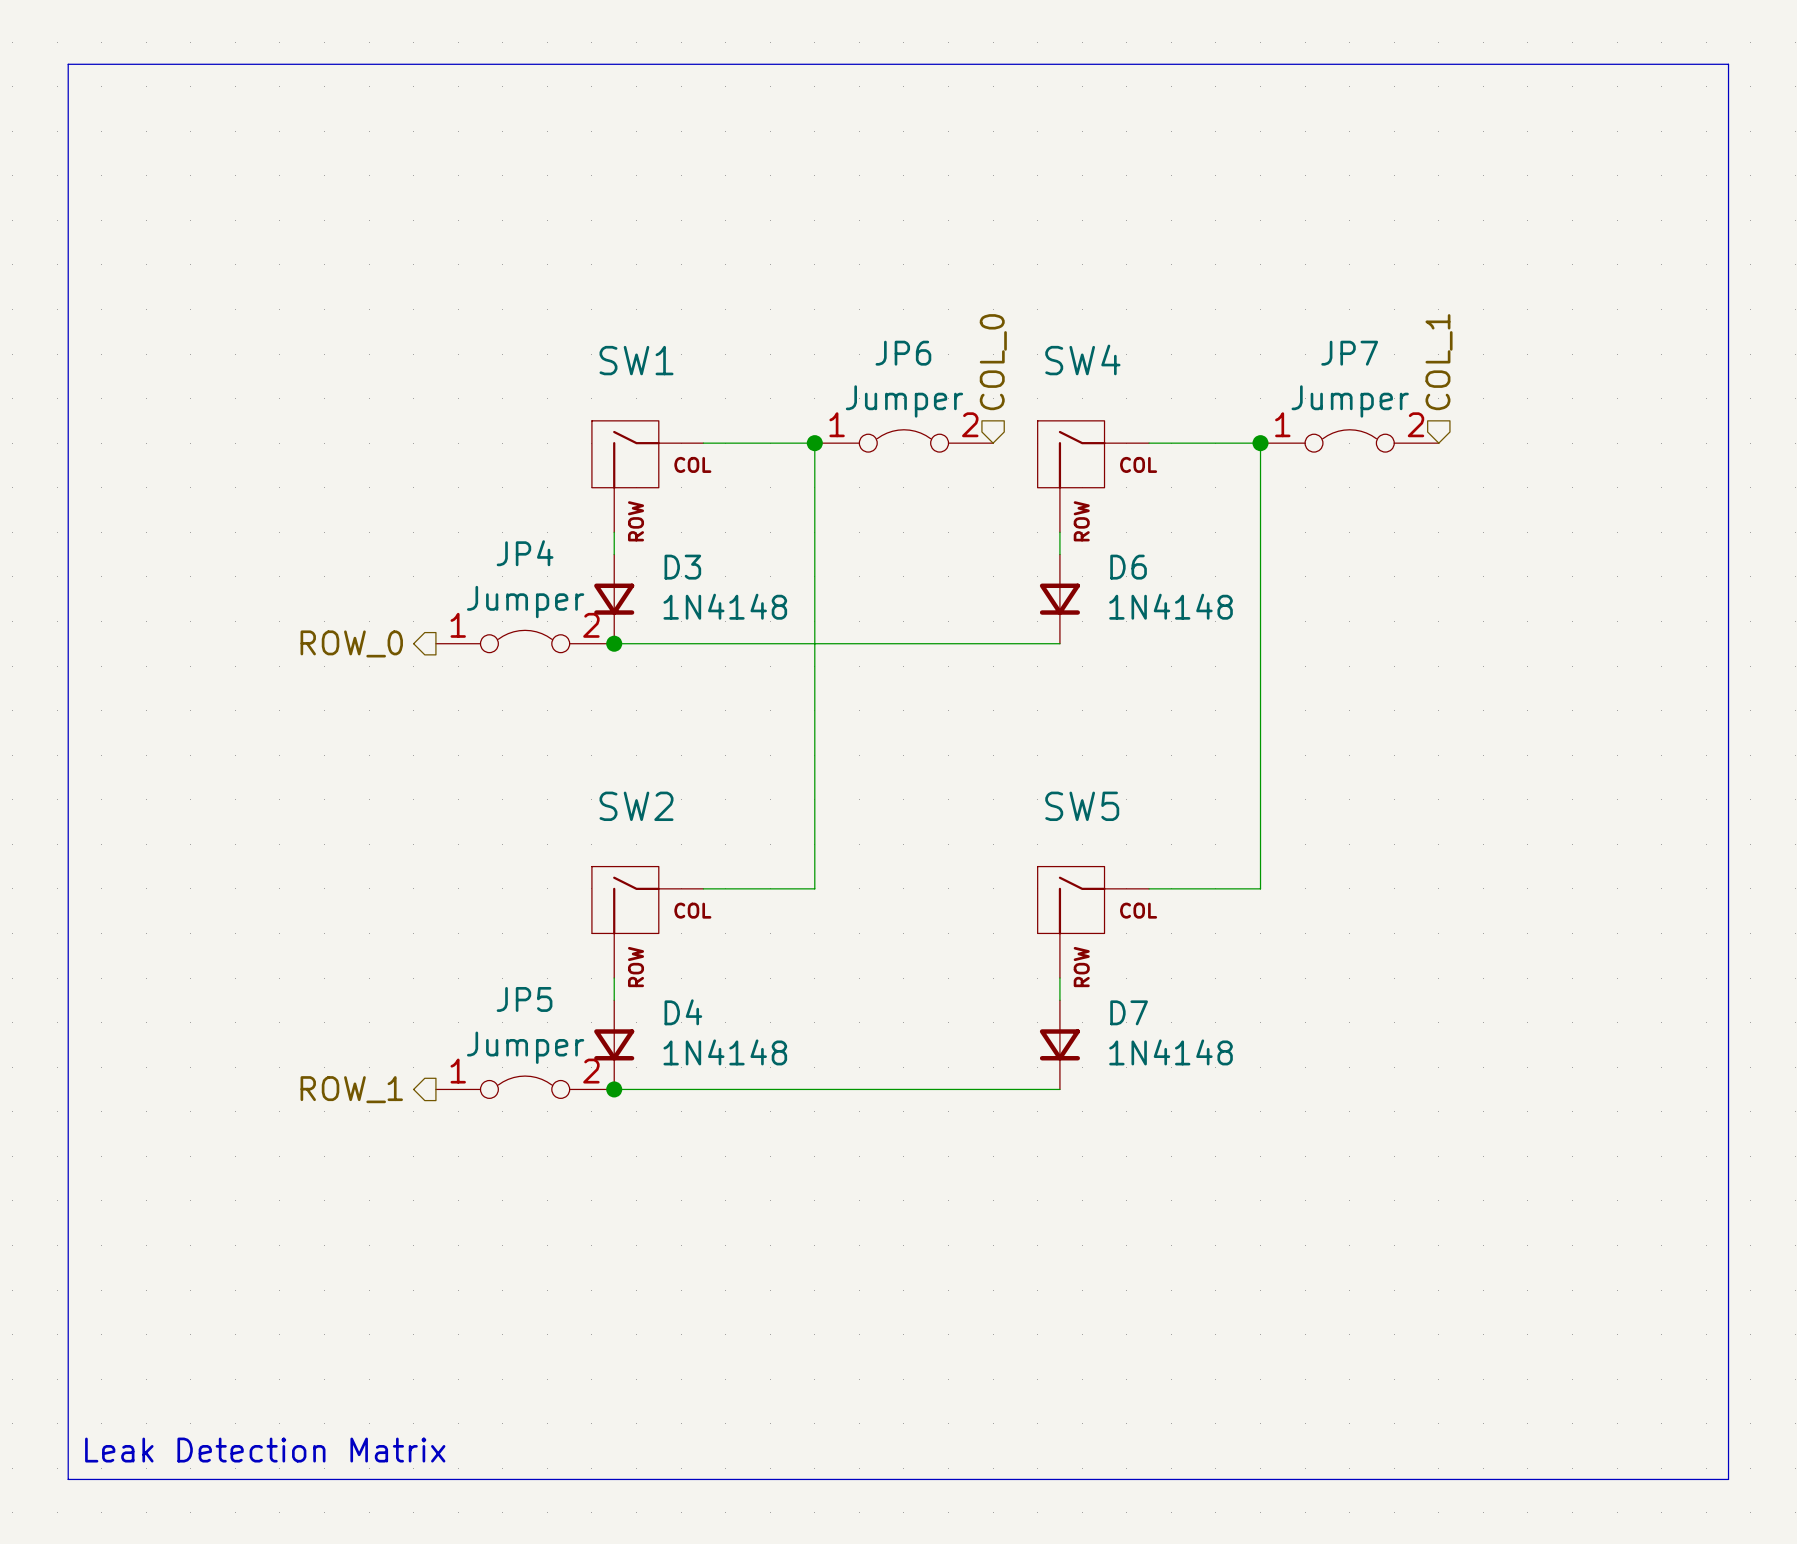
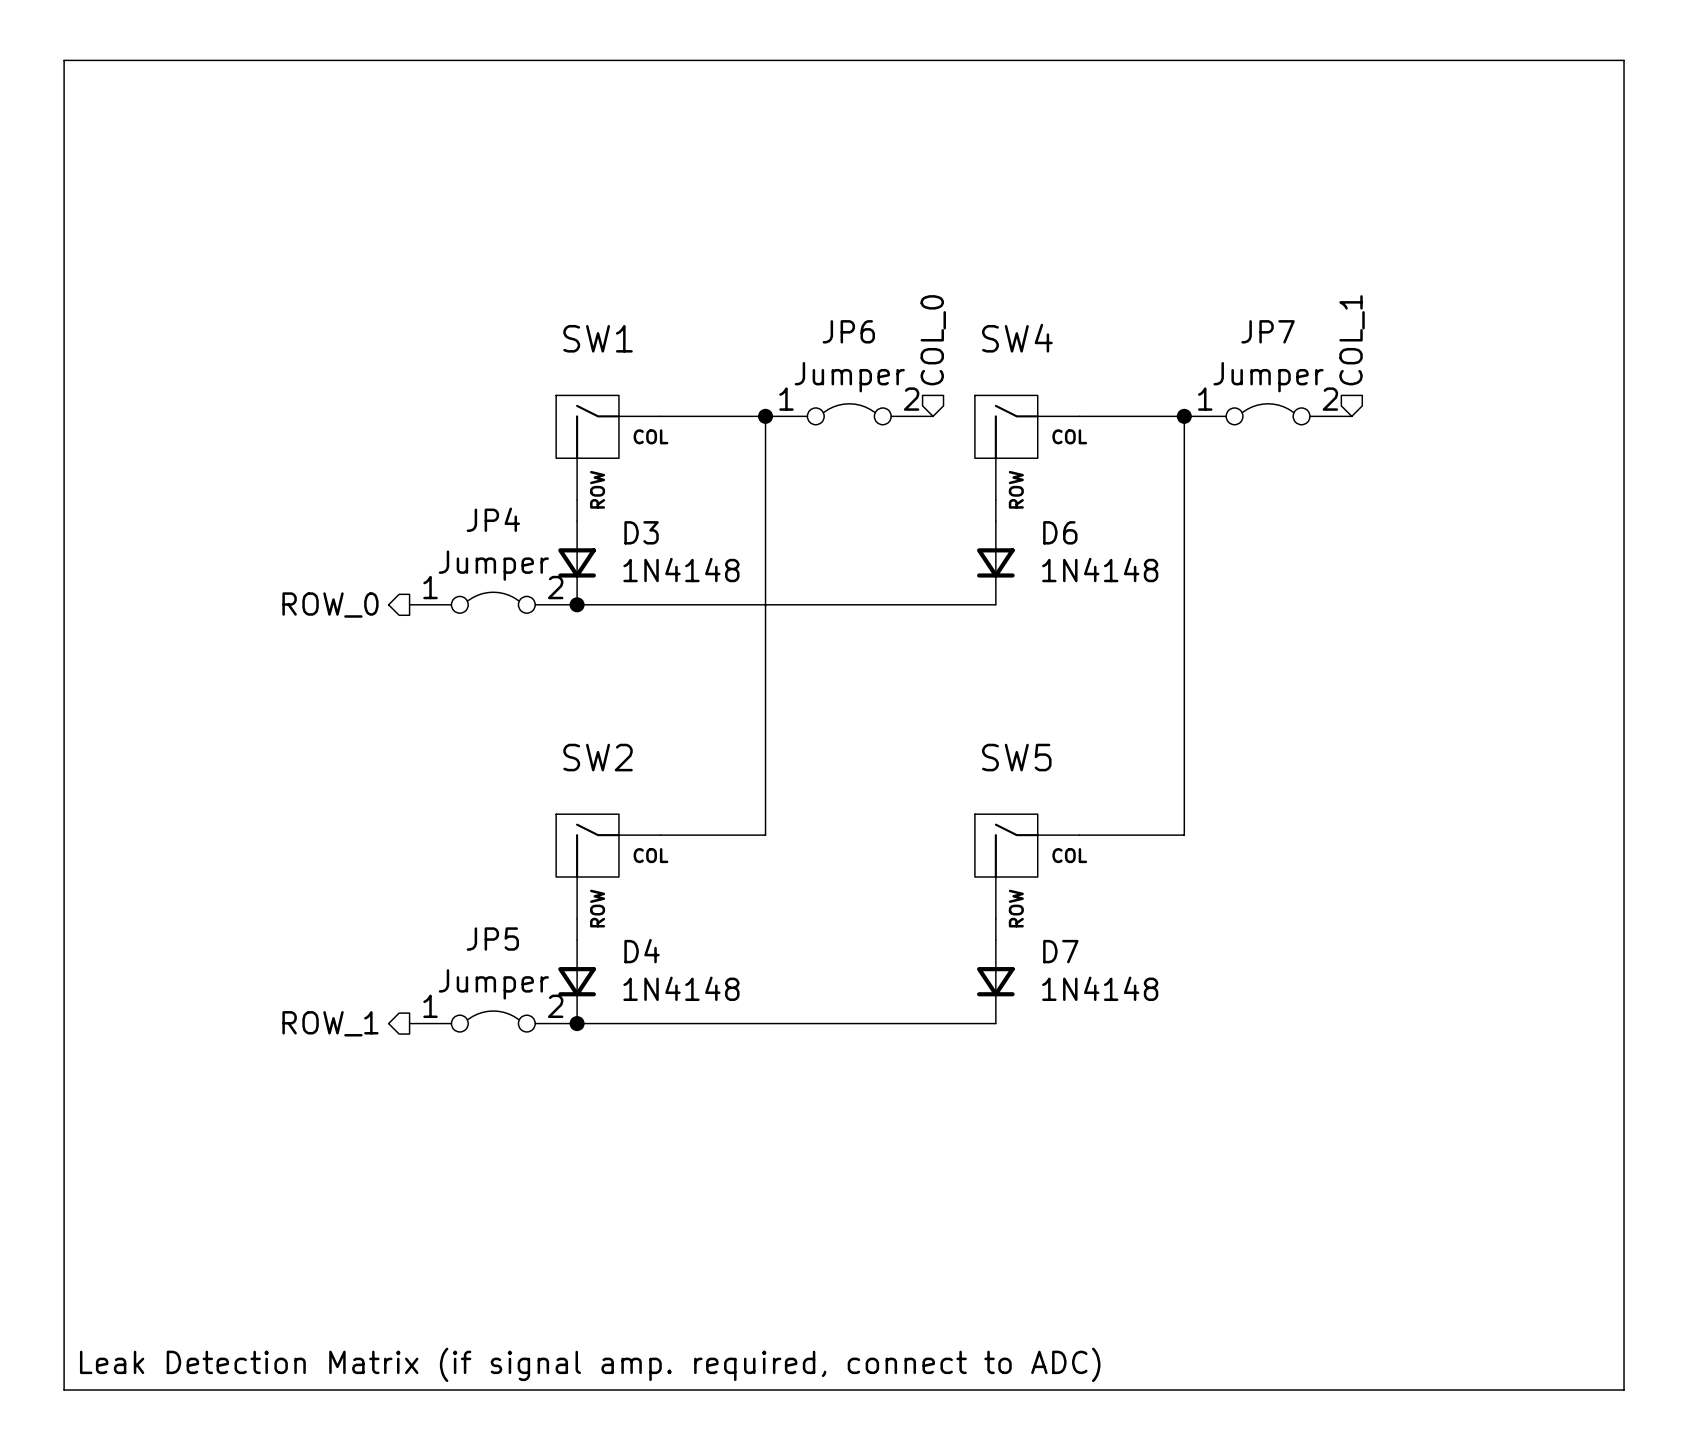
text: Leak Detection Matrix (265, 1450) -> Leak Detection Matrix (if signal amp. required, connect to ADC) (590, 1364)

